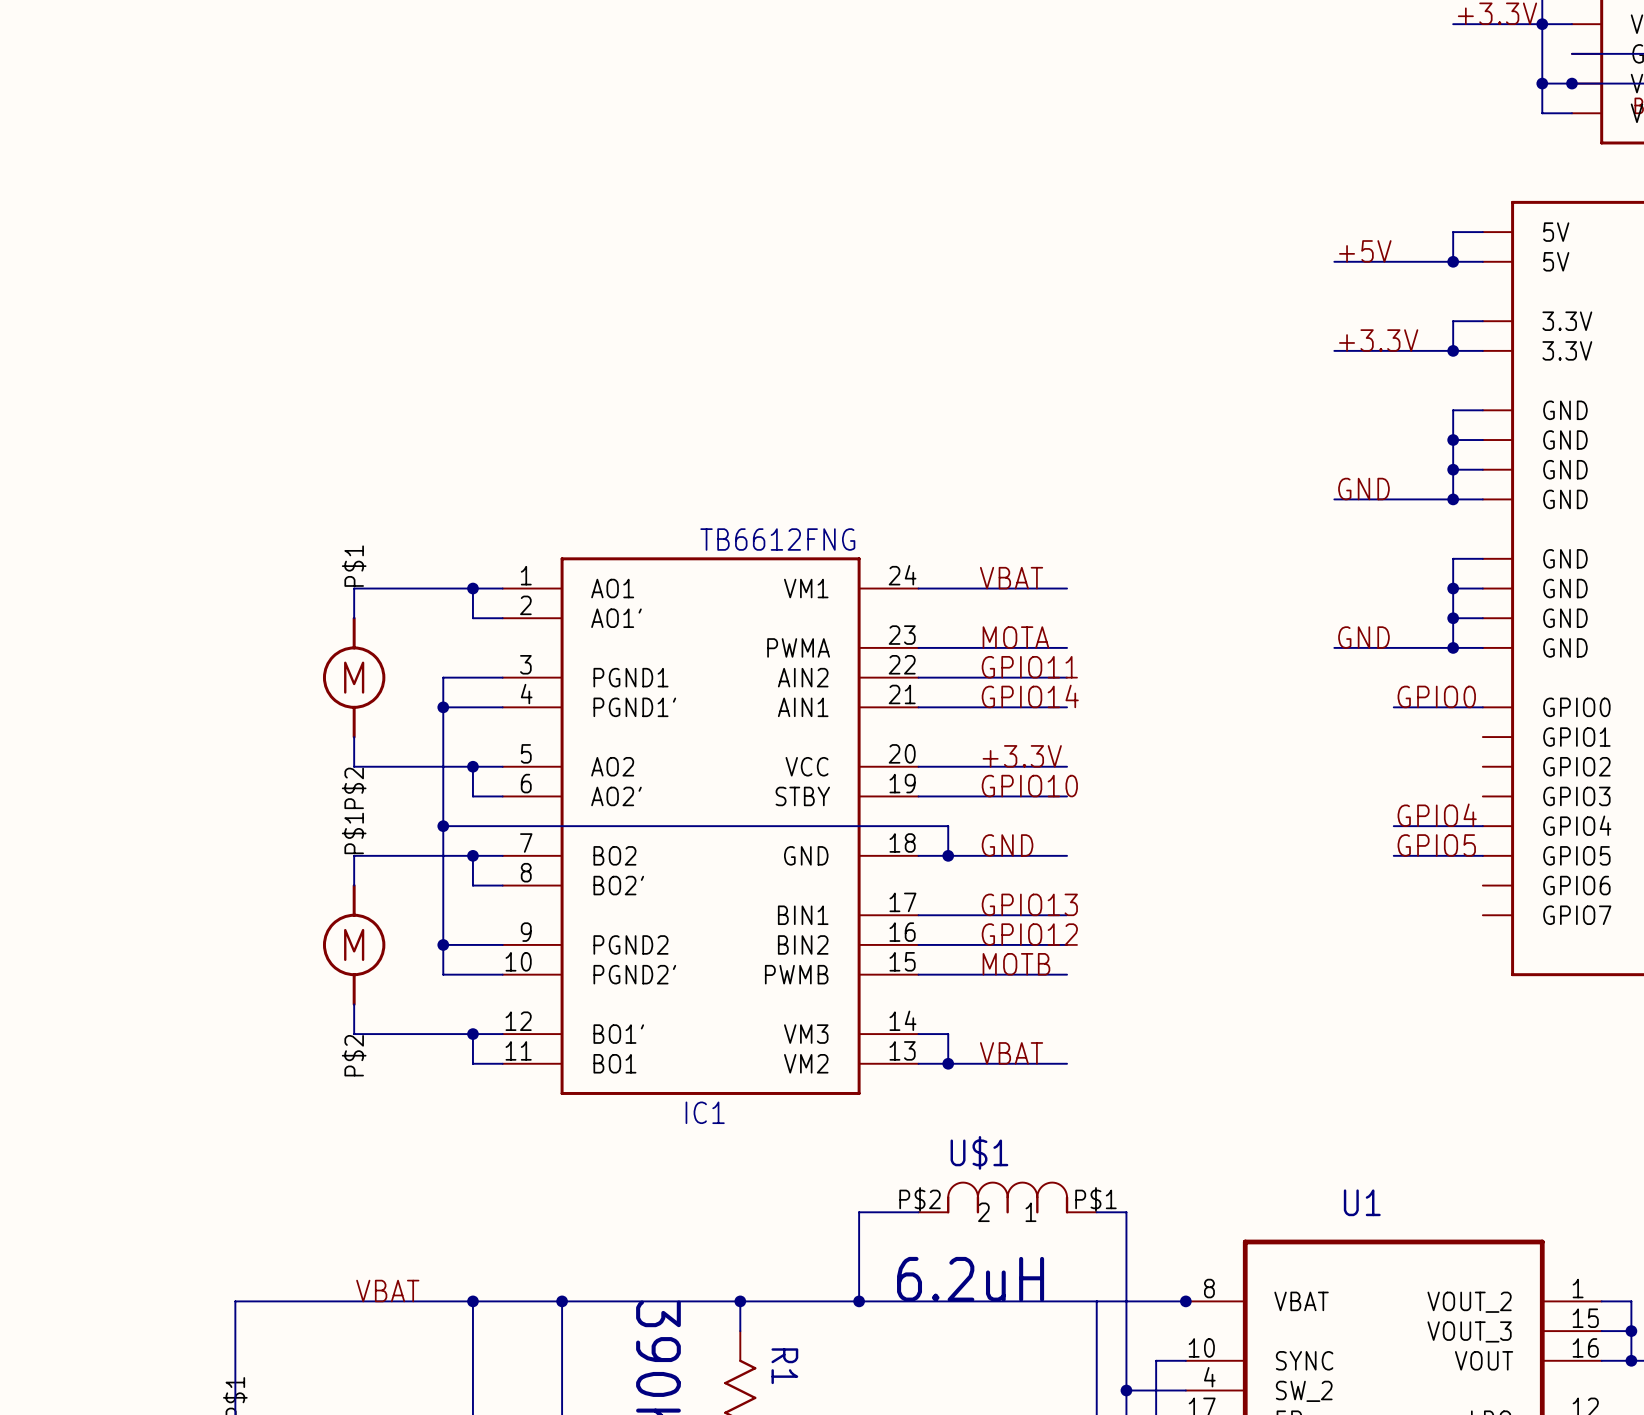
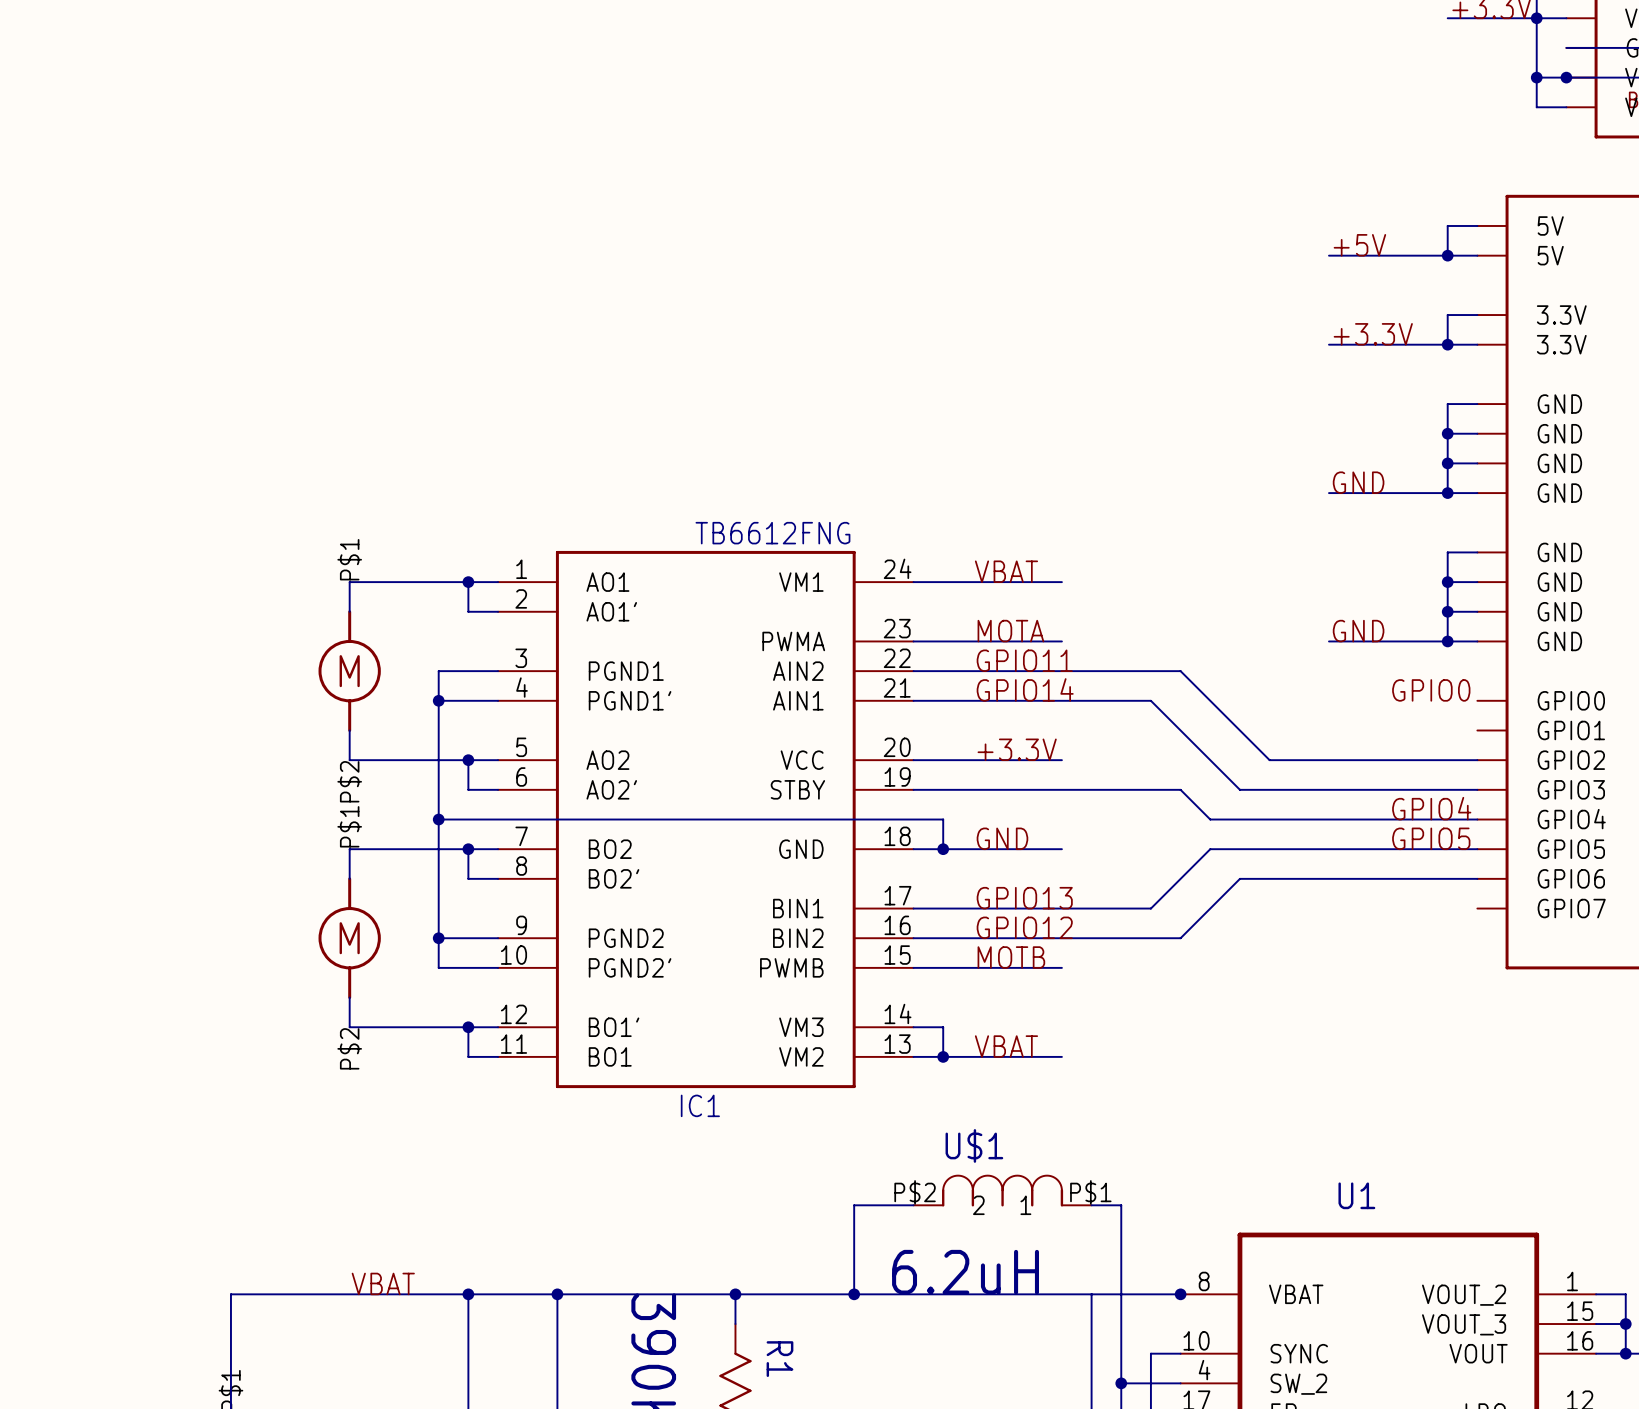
wire: none -> (1061, 671) (1180, 671) (1269, 760) (1477, 760)
wire: none -> (1061, 700) (1150, 700) (1239, 789) (1477, 789)
wire: (1393, 707) (1482, 707) -> none
label: GPIO10 (1029, 786) -> none
wire: none -> (1061, 789) (1180, 789) (1210, 819) (1388, 819)
wire: none -> (1388, 849) (1210, 849) (1150, 908) (1061, 908)
wire: none -> (1477, 878) (1239, 878) (1180, 938) (1061, 938)

